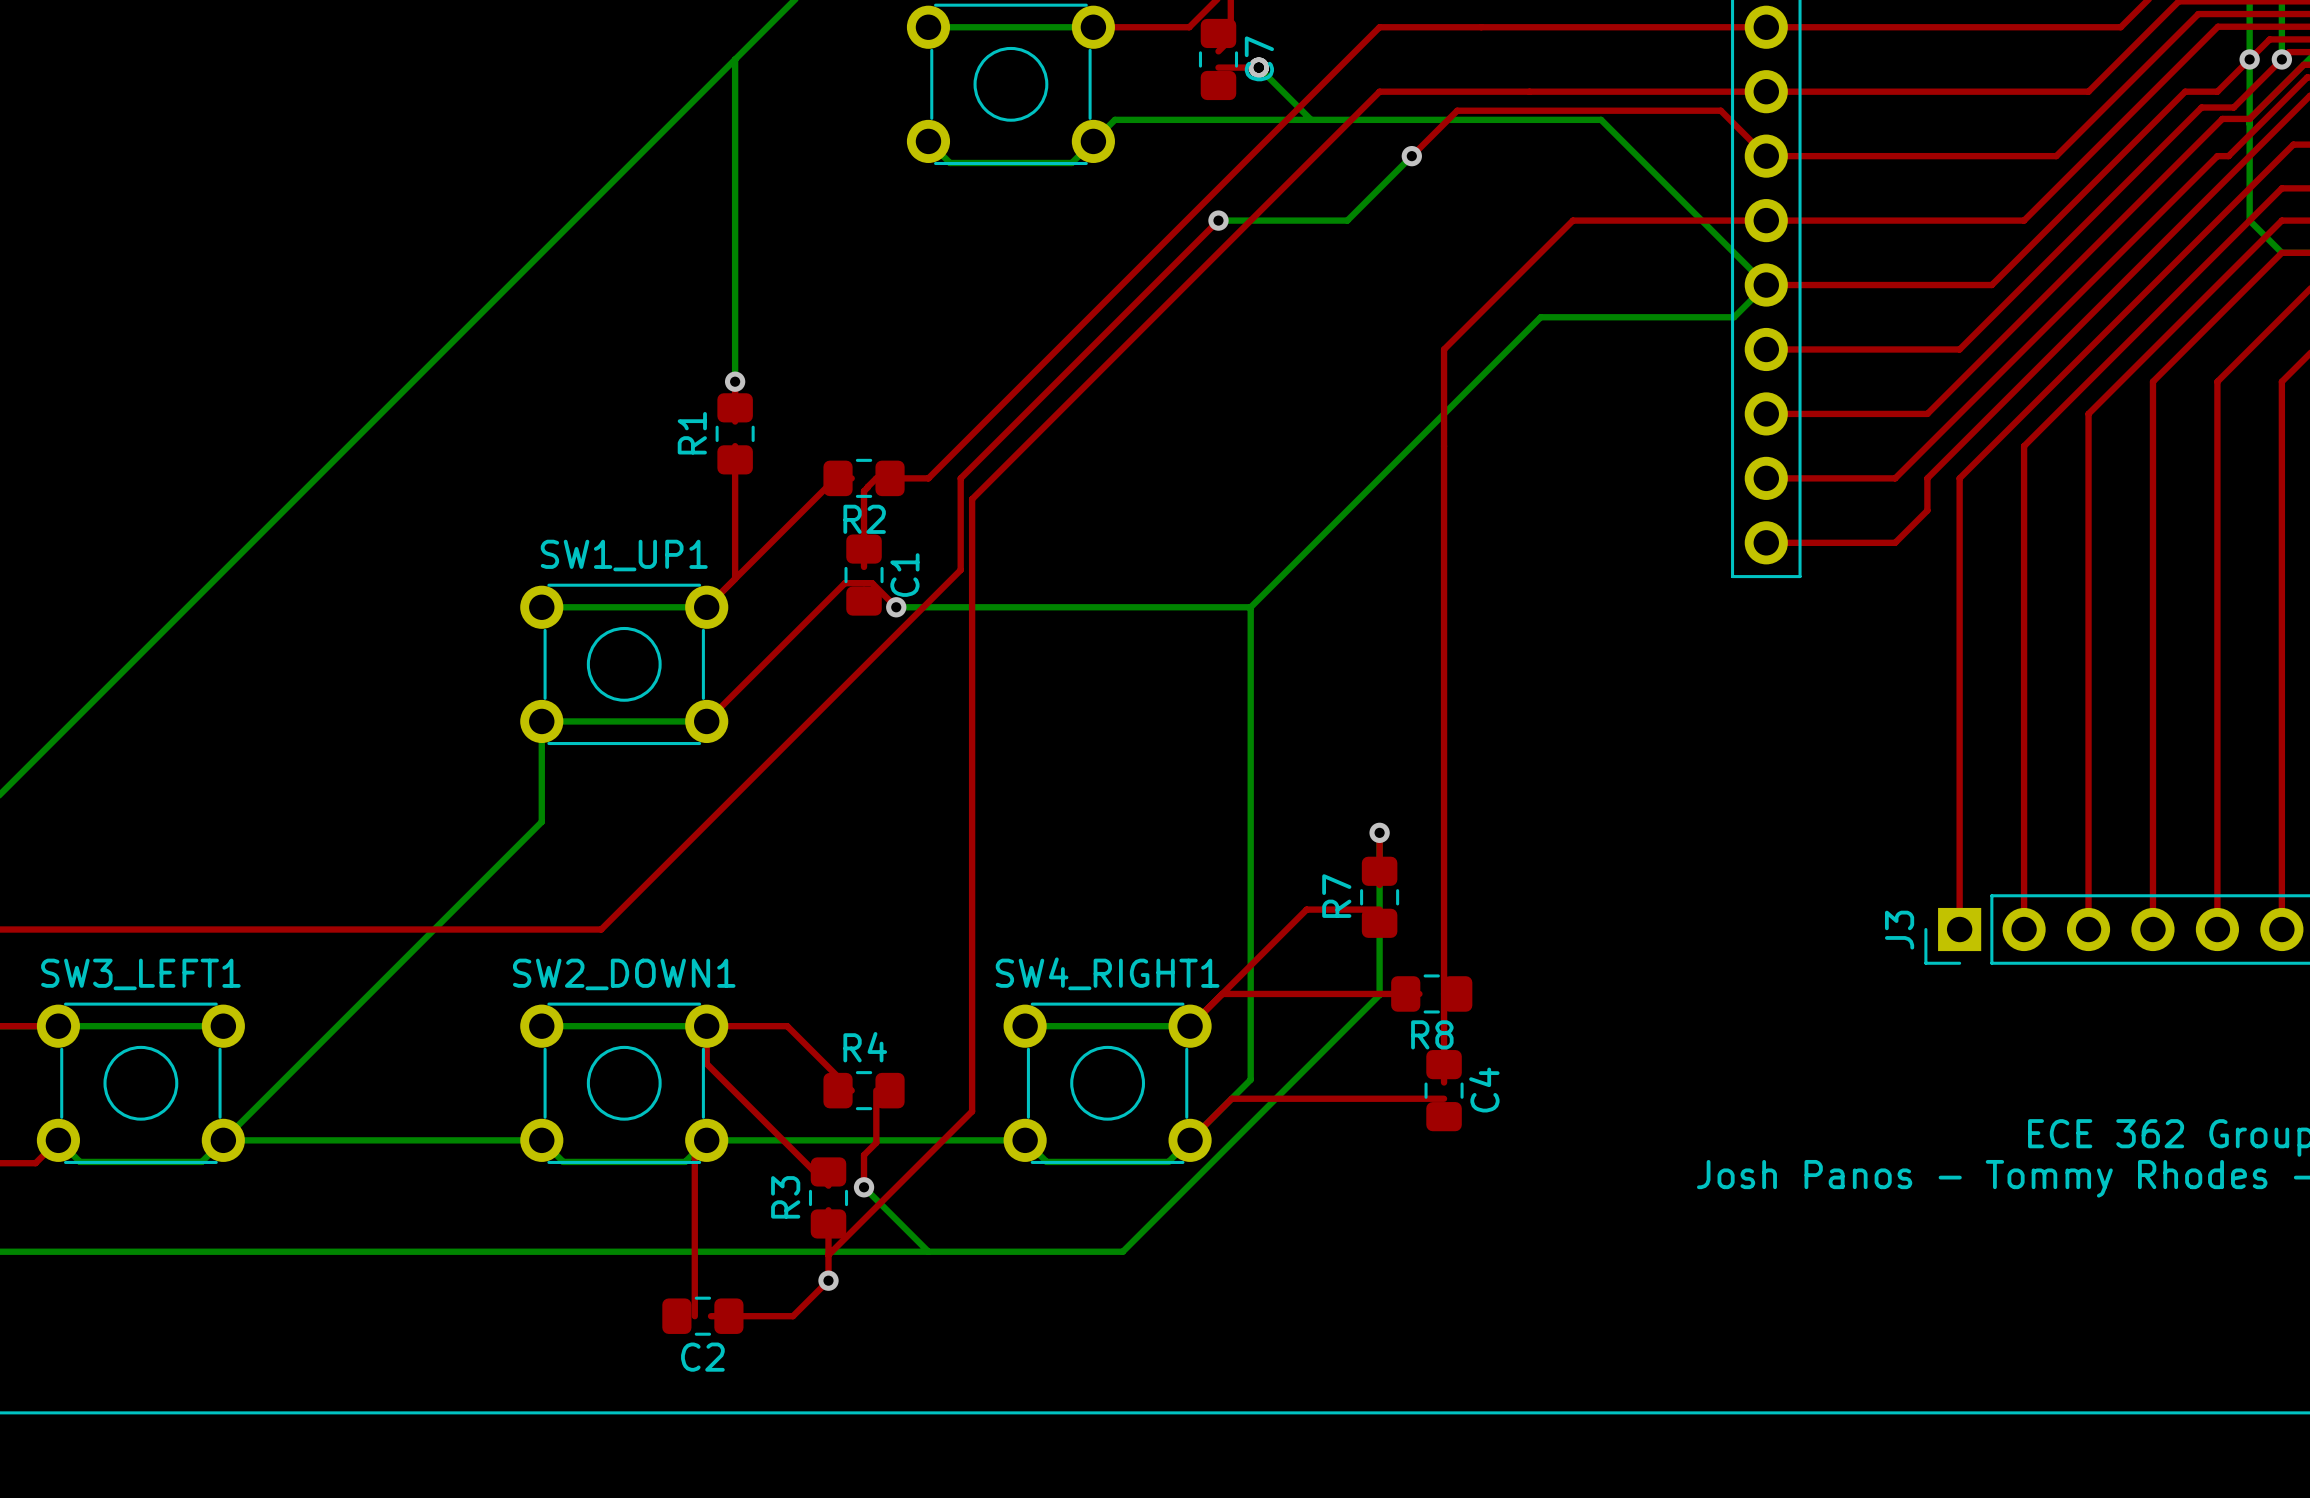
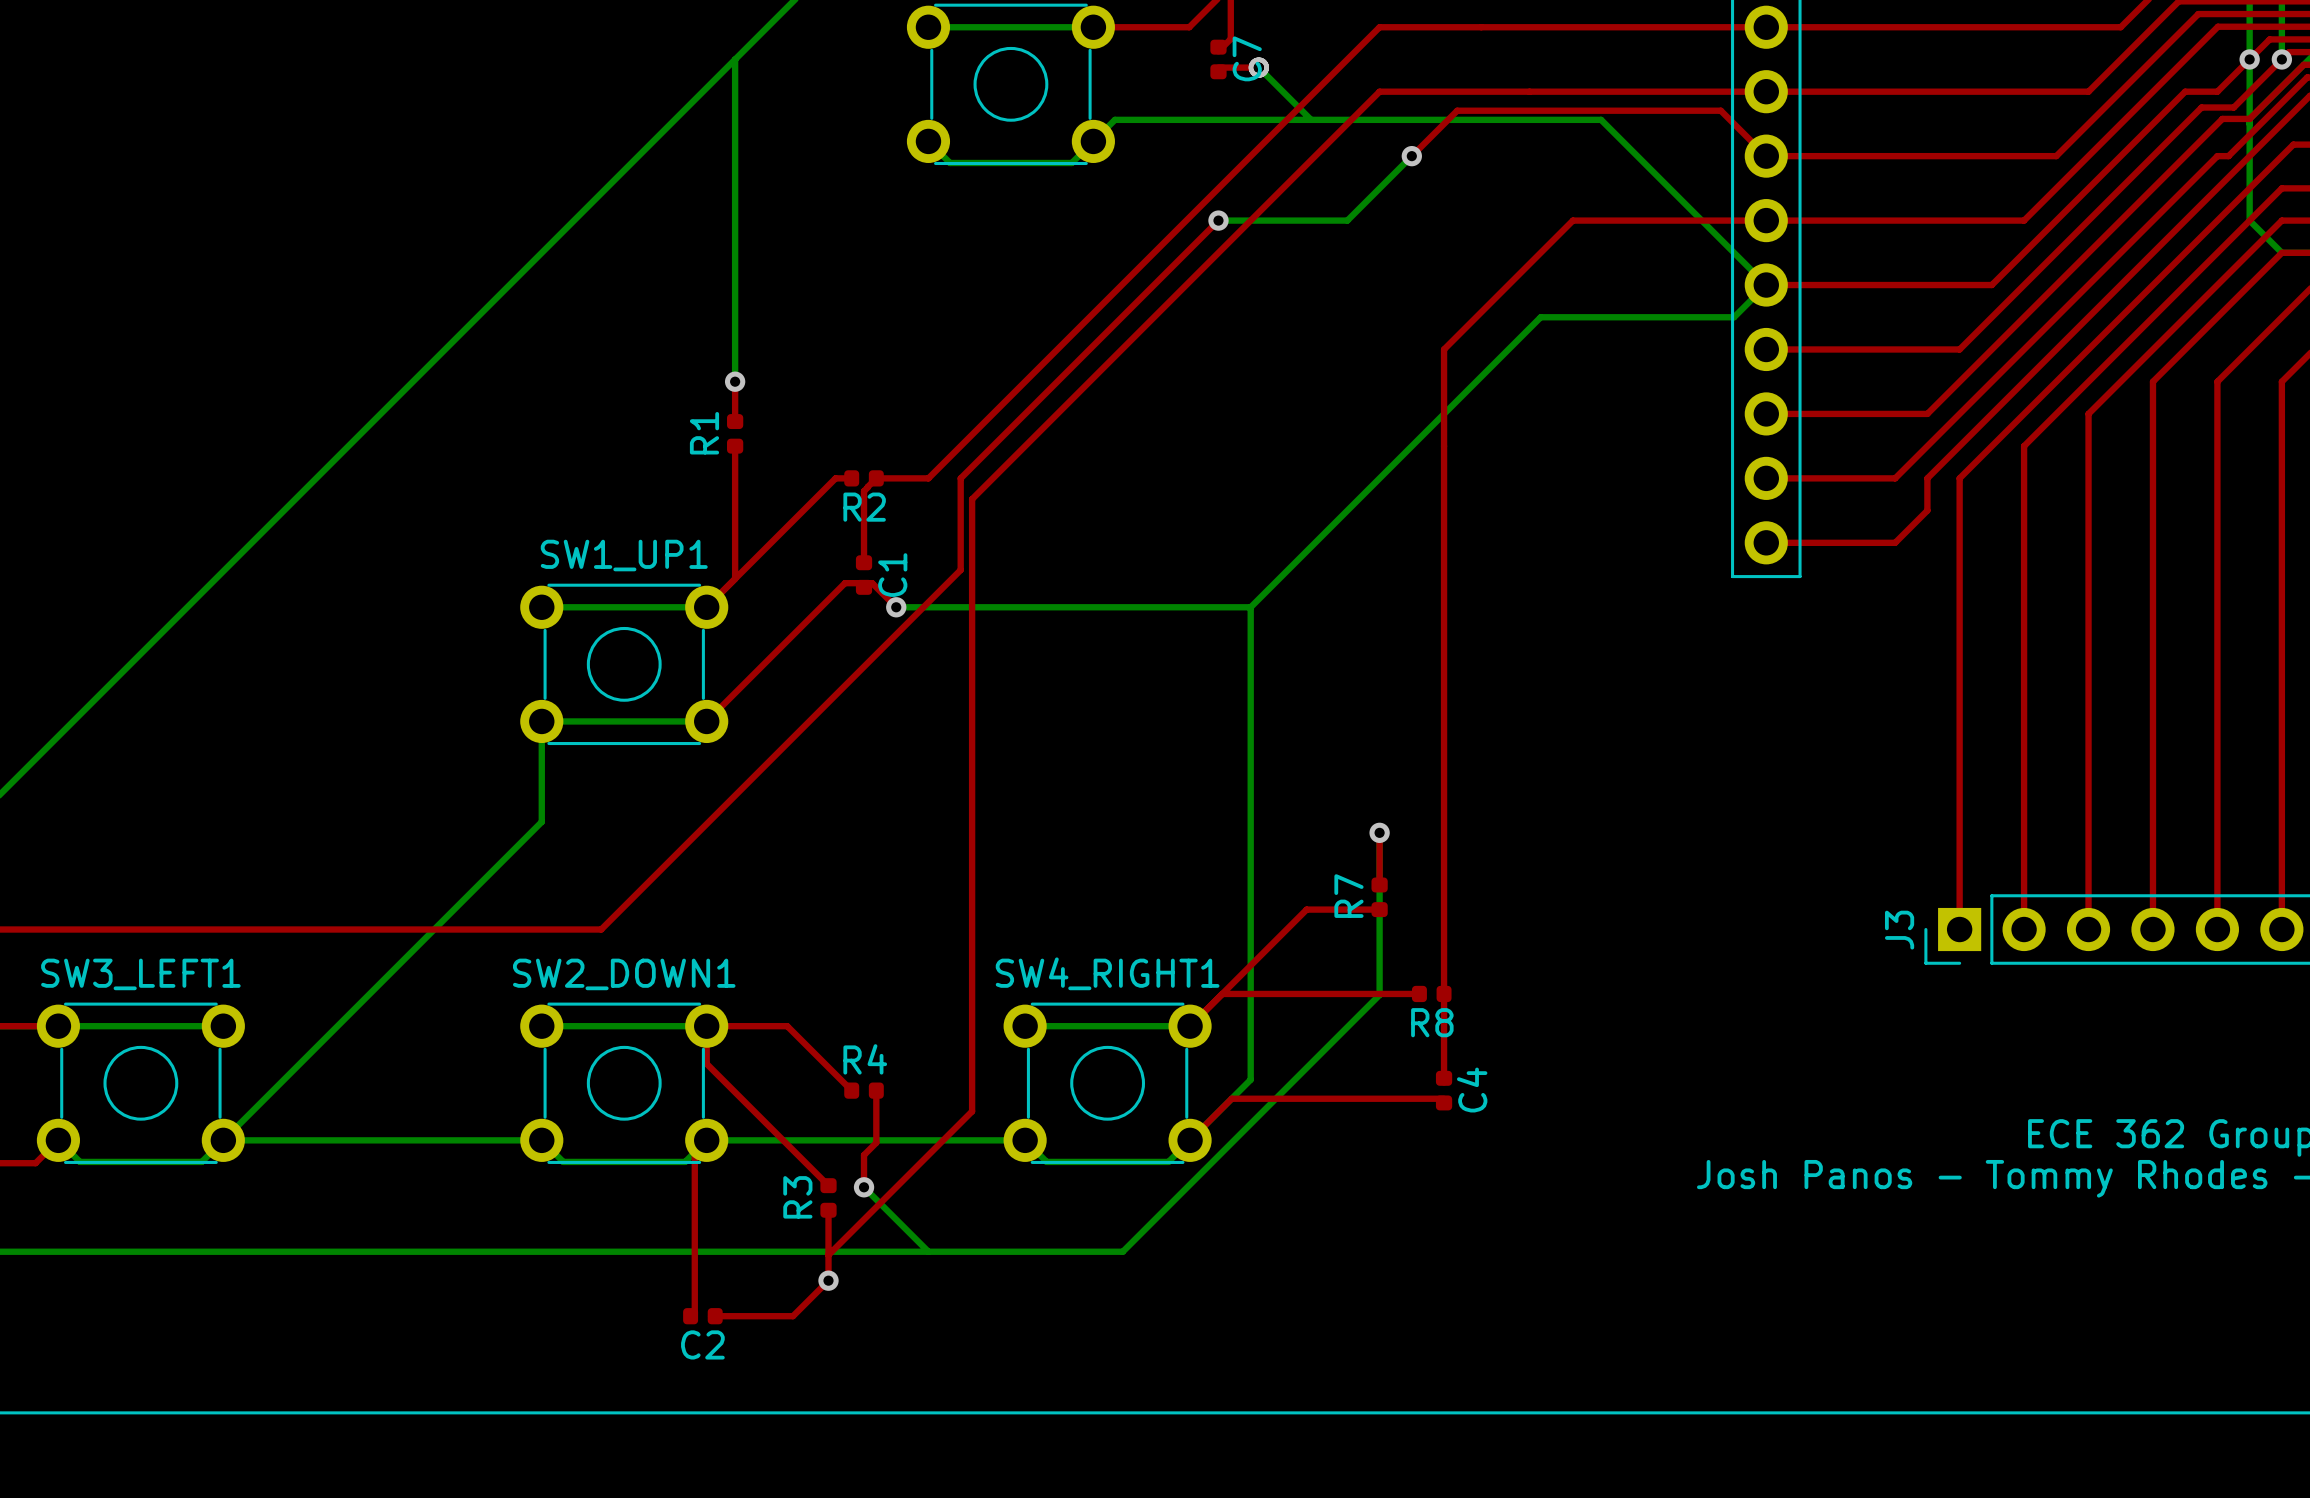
C7 footprint: [1198, 18, 1239, 101] -> [1210, 39, 1227, 80]
R1 footprint: [715, 393, 755, 475] -> [727, 414, 744, 454]
R2 footprint: [823, 458, 905, 498] -> [844, 470, 884, 487]
C1 footprint: [844, 534, 884, 616] -> [855, 555, 873, 595]
R7 footprint: [1360, 856, 1400, 938] -> [1371, 877, 1388, 918]
R8 footprint: [1391, 974, 1473, 1014] -> [1411, 985, 1452, 1003]
C4 footprint: [1424, 1050, 1464, 1132] -> [1435, 1070, 1453, 1111]
R4 footprint: [823, 1071, 905, 1111] -> [844, 1082, 884, 1099]
R3 footprint: [808, 1157, 849, 1239] -> [820, 1178, 837, 1218]
C2 footprint: [662, 1296, 744, 1336] -> [683, 1308, 723, 1325]

